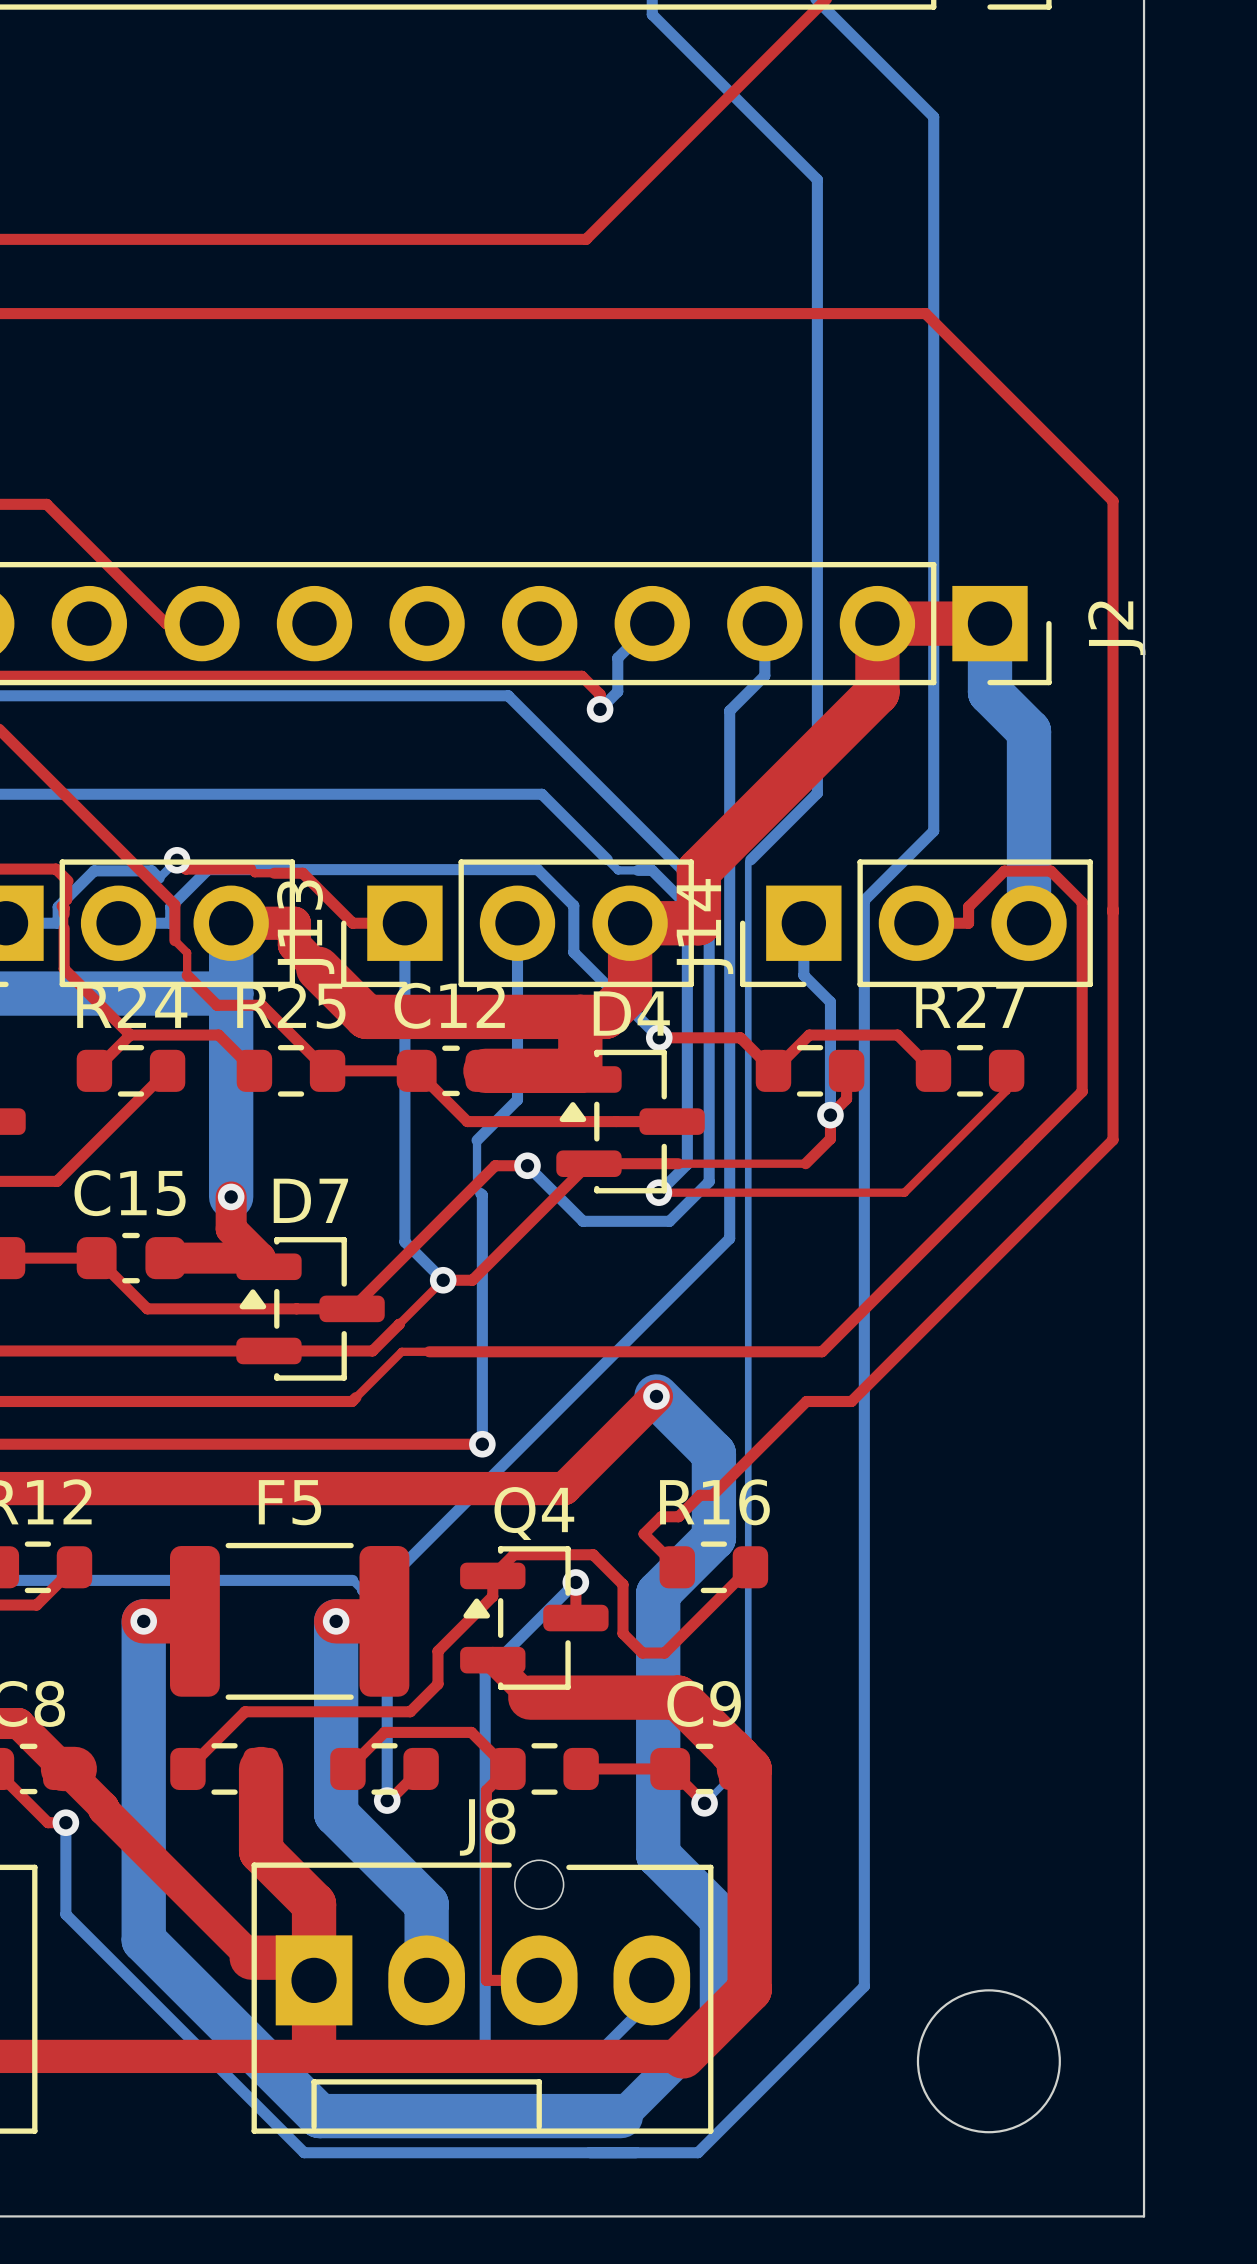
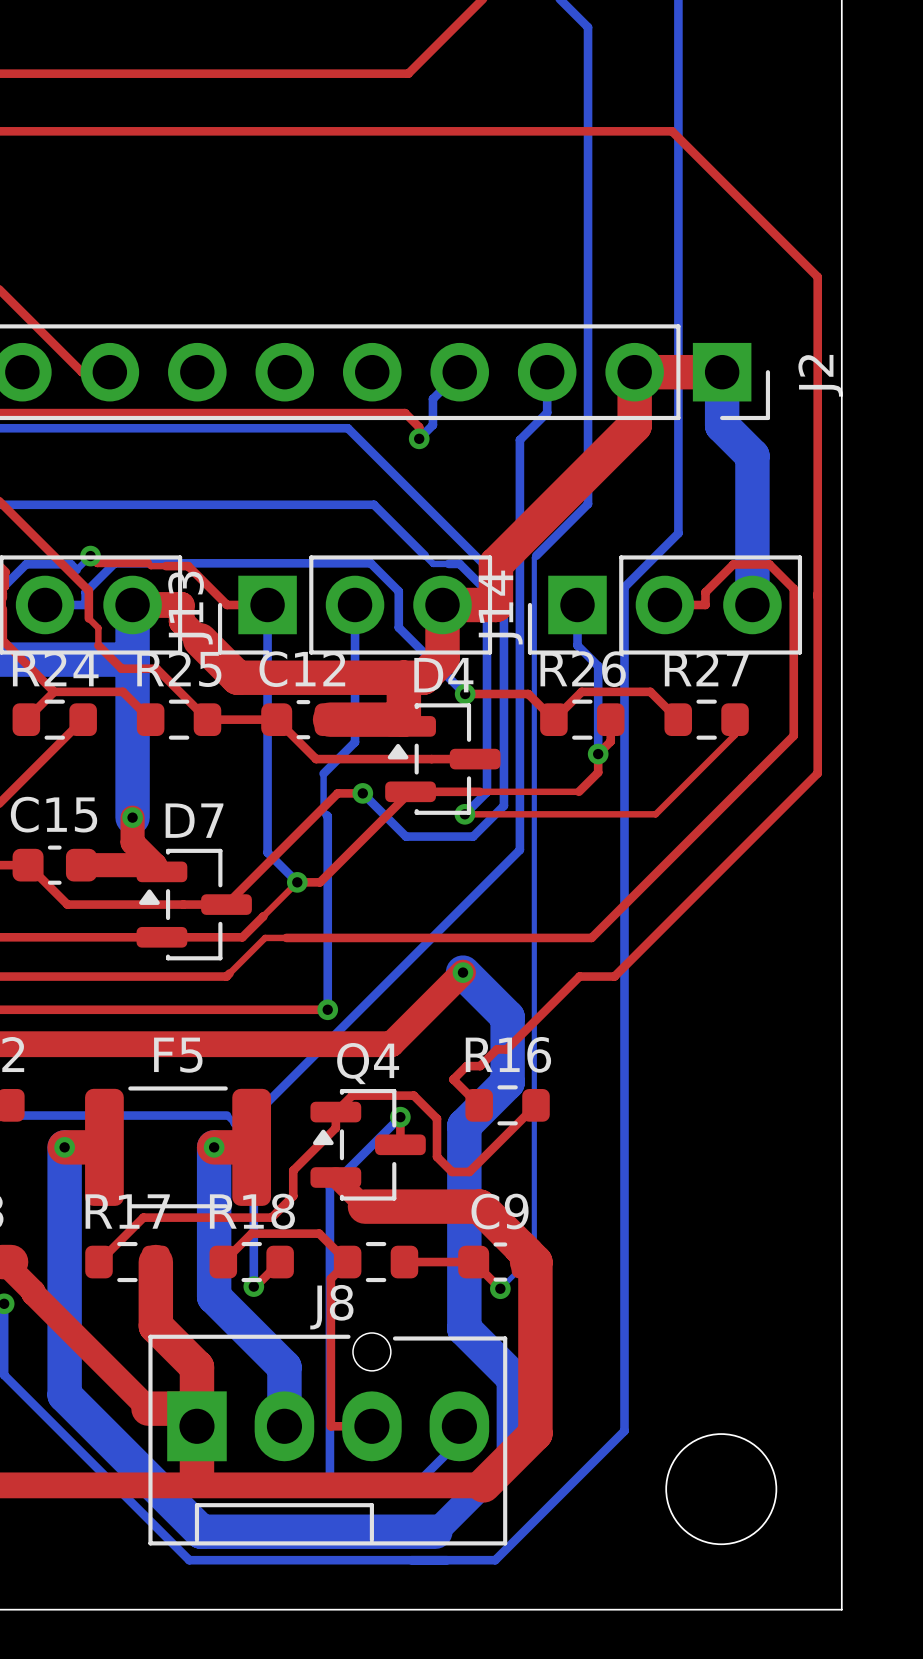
R26 name: none -> R26 (583, 669)
R17 name: none -> R17 (127, 1211)
R18 name: none -> R18 (252, 1211)

